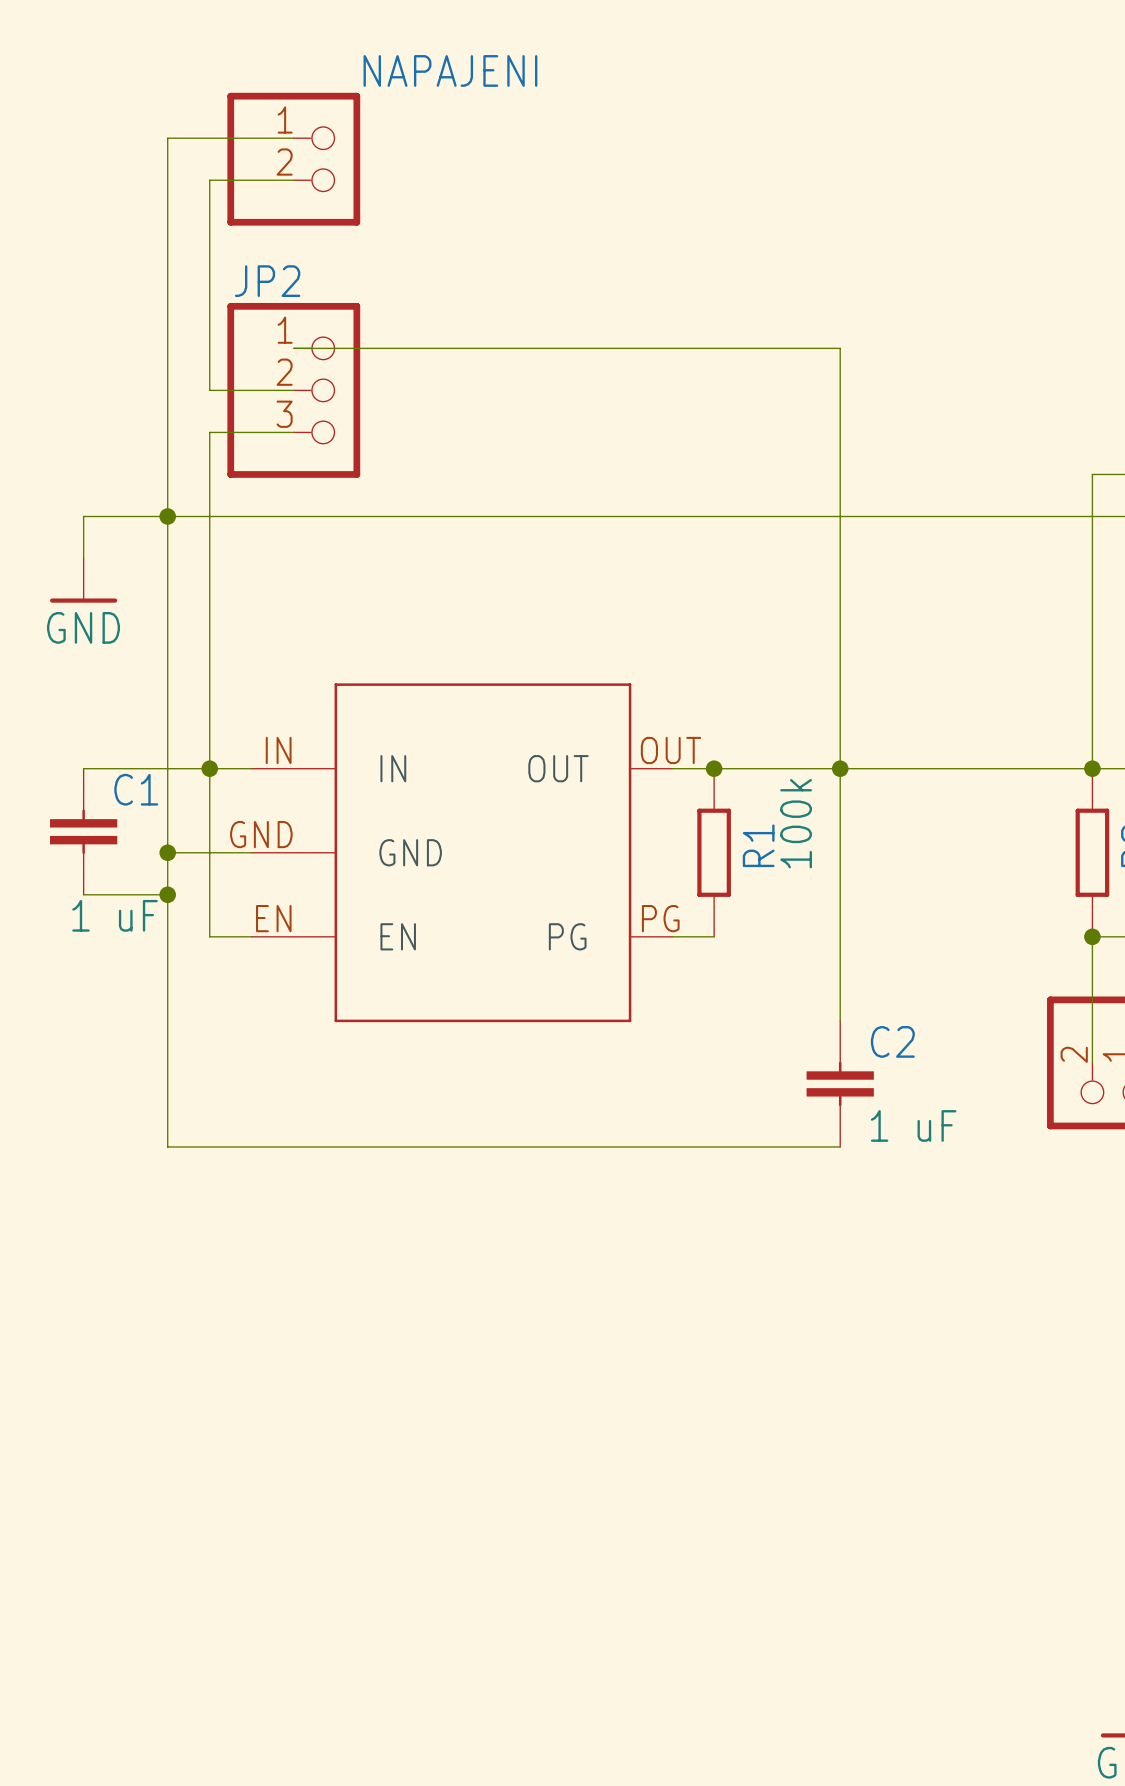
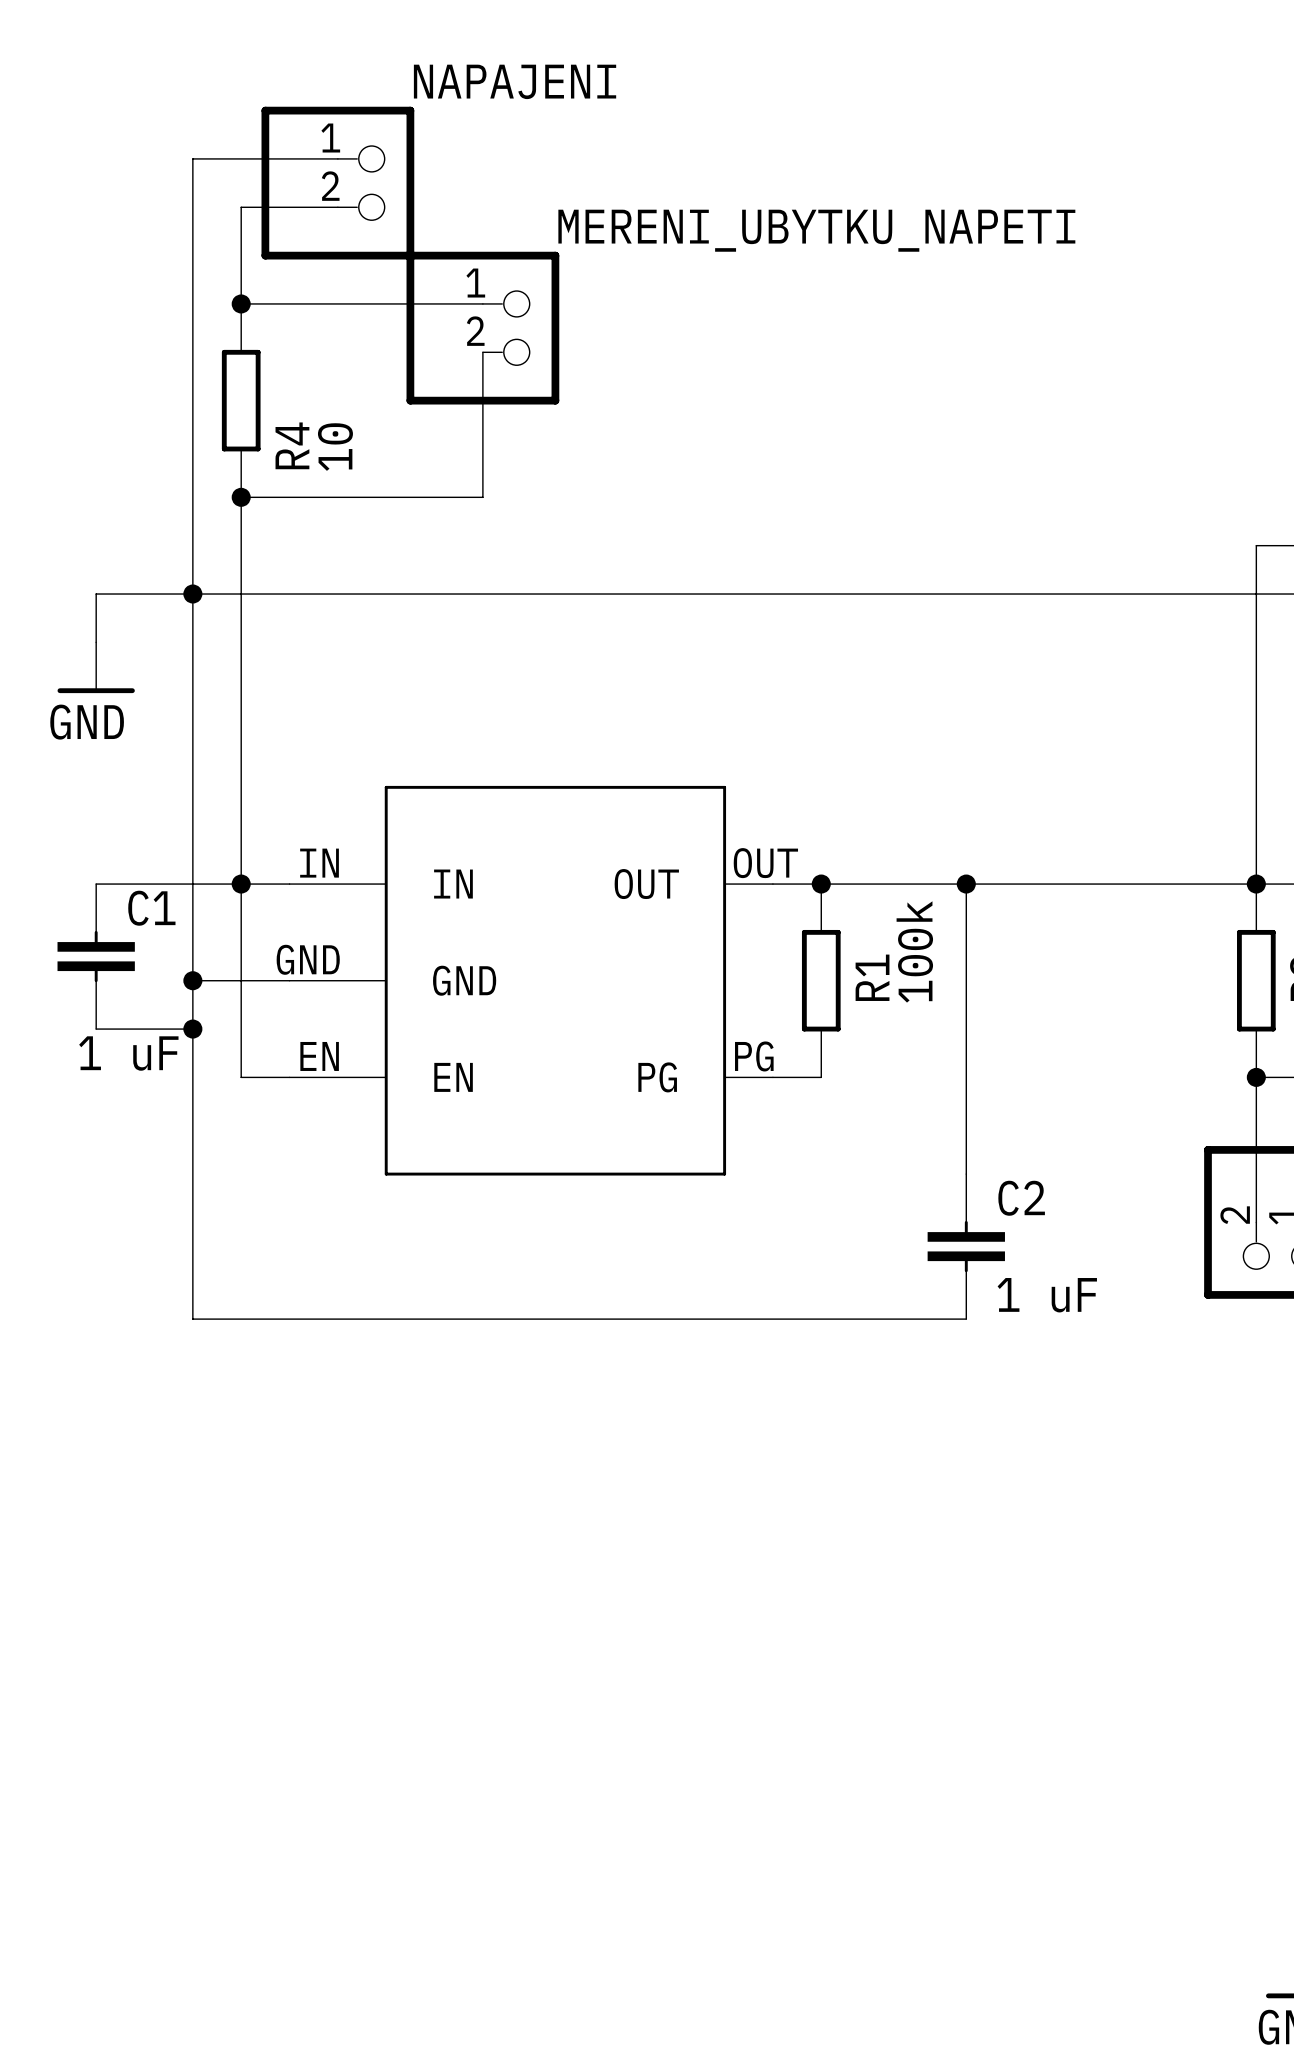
wire: (209, 264) (209, 390) (293, 390) -> (241, 303) (482, 303)
junction: none -> (241, 303)
MERENI_UBYTKU_NAPETI: none -> (482, 328)
wire: none -> (482, 352) (482, 497) (337, 497)
R4: none -> 10 (241, 400)
wire: (293, 348) (840, 348) (840, 768) -> none
JP2: (293, 390) -> none
junction: none -> (241, 497)

